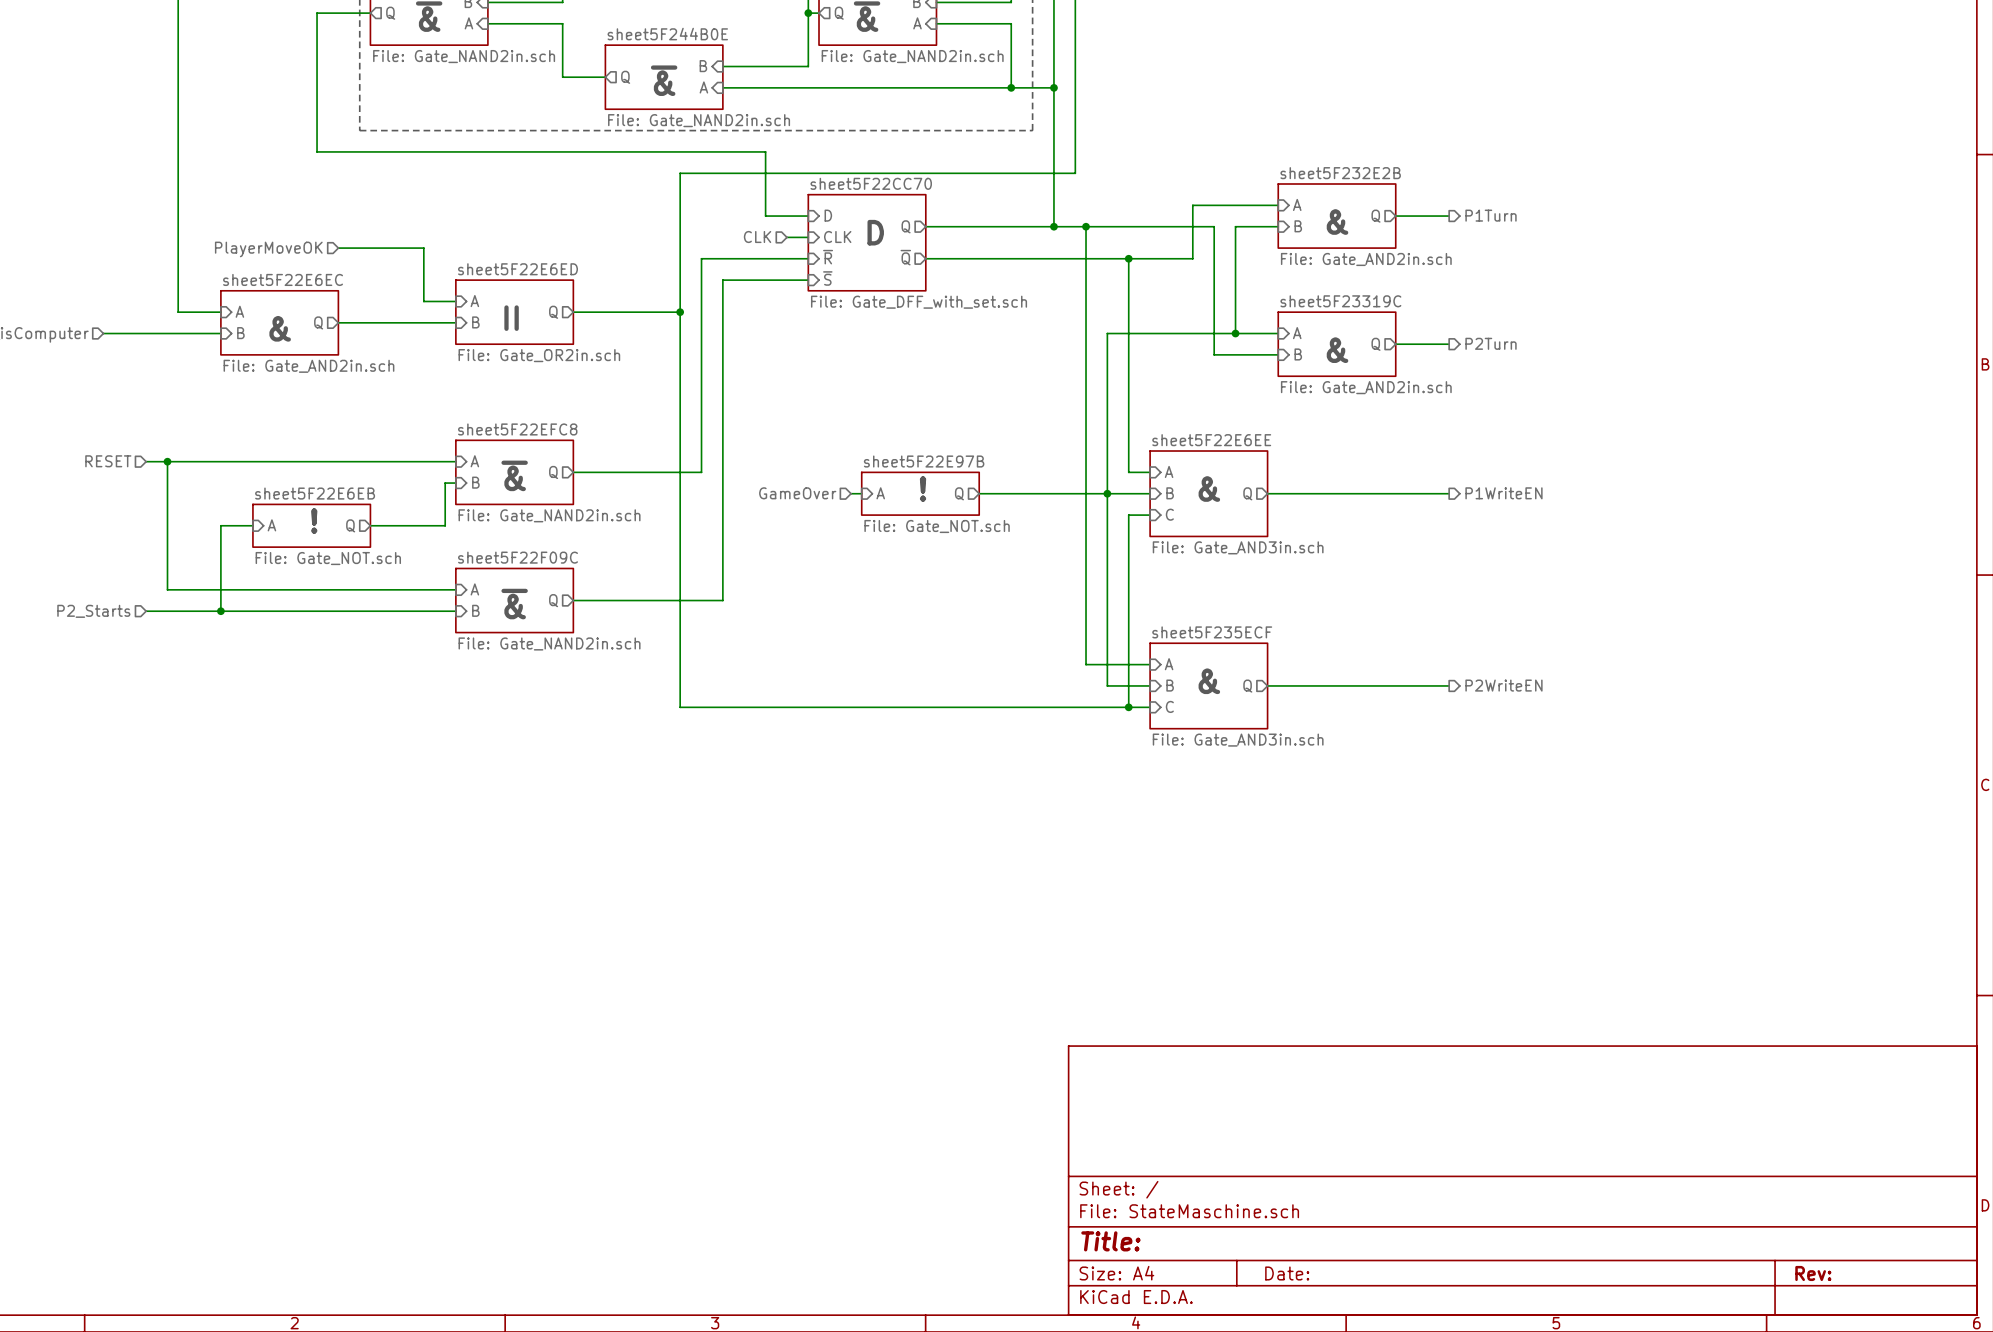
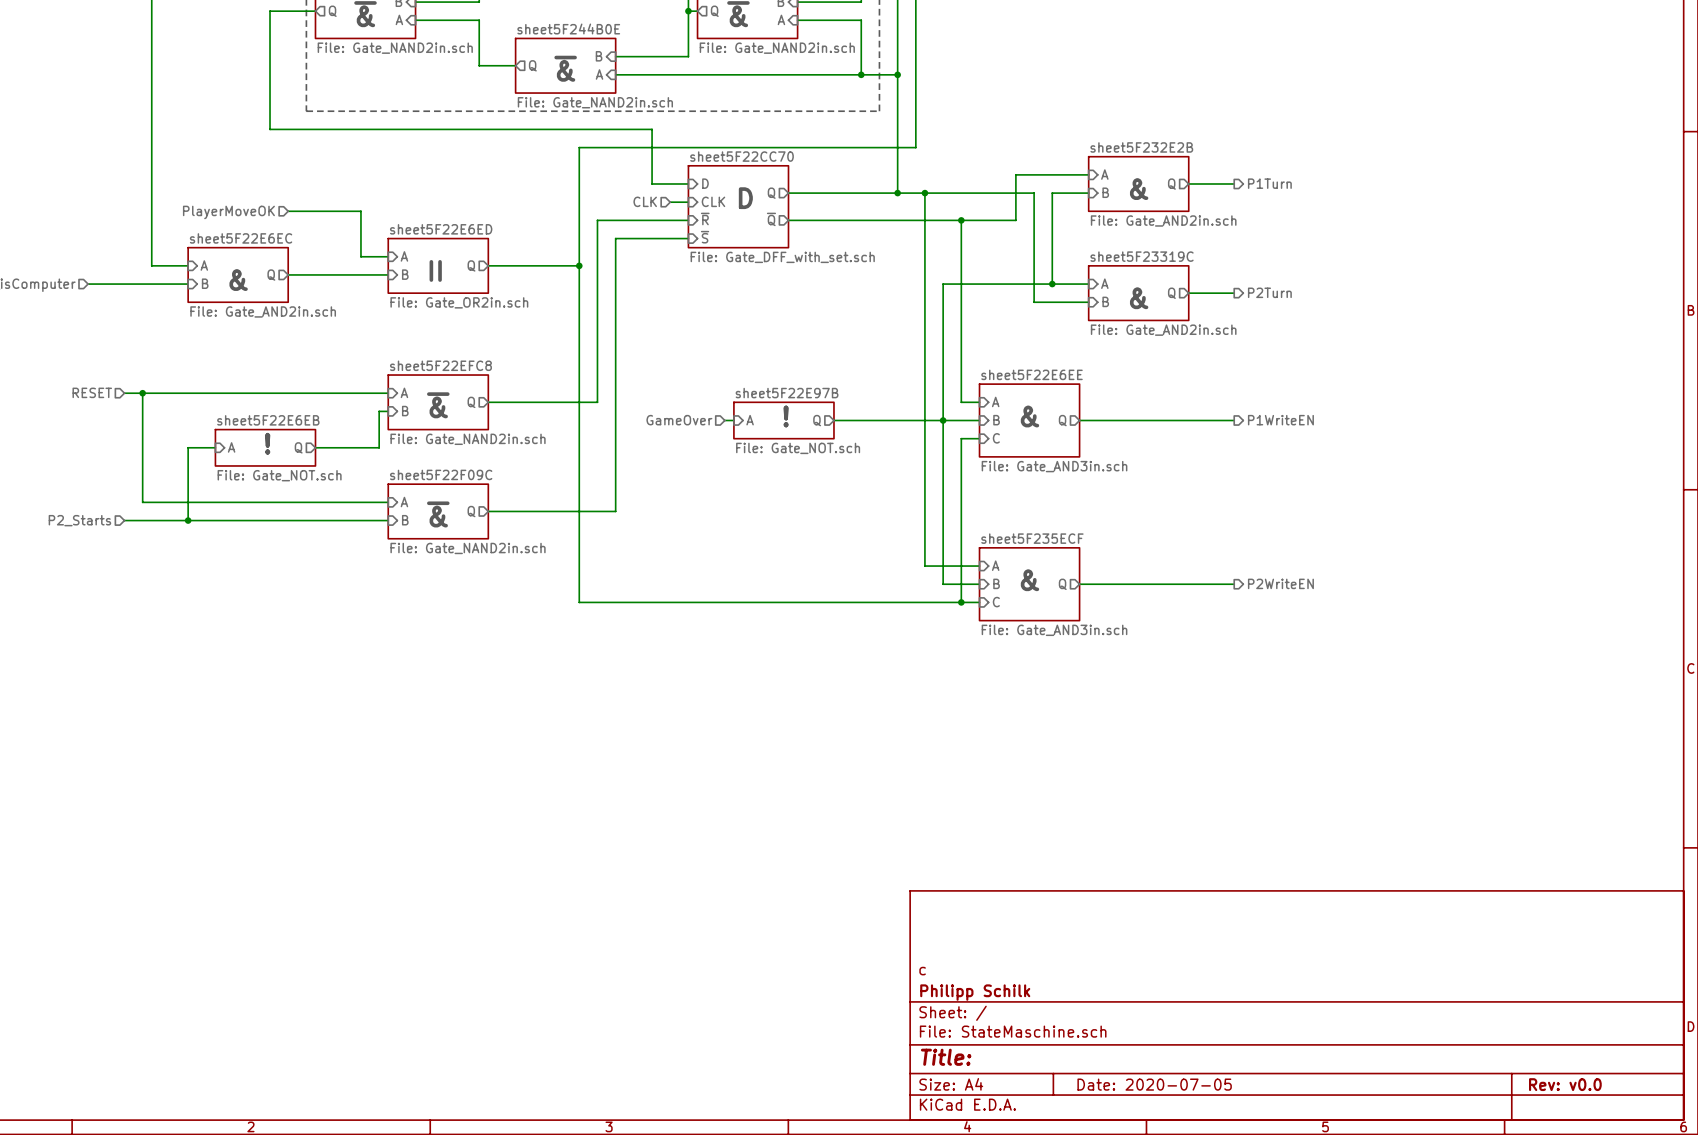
title block: none -> c (922, 971)
title block: none -> Philipp Schilk (975, 992)
title block: Date: (1287, 1273) -> Date: 2020-07-05 (1154, 1084)
title block: Rev: (1813, 1273) -> Rev: v0.0 (1565, 1084)

